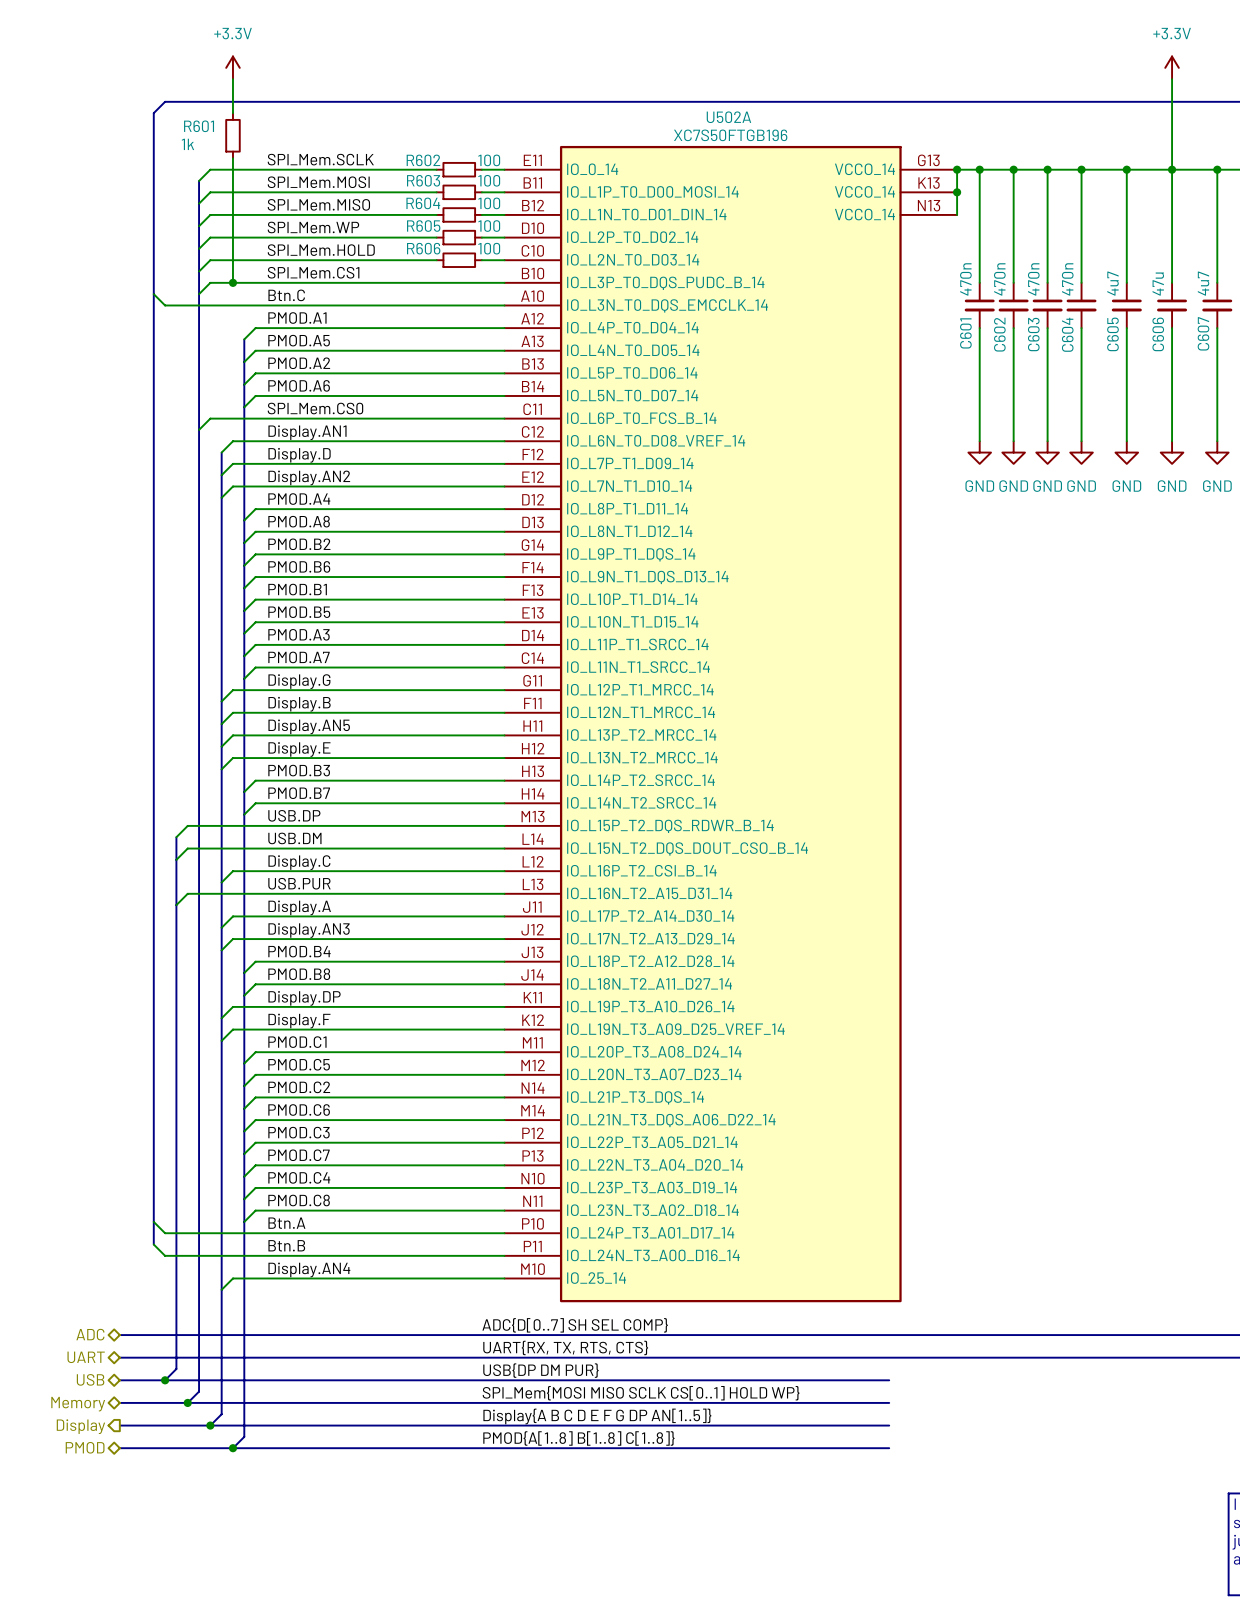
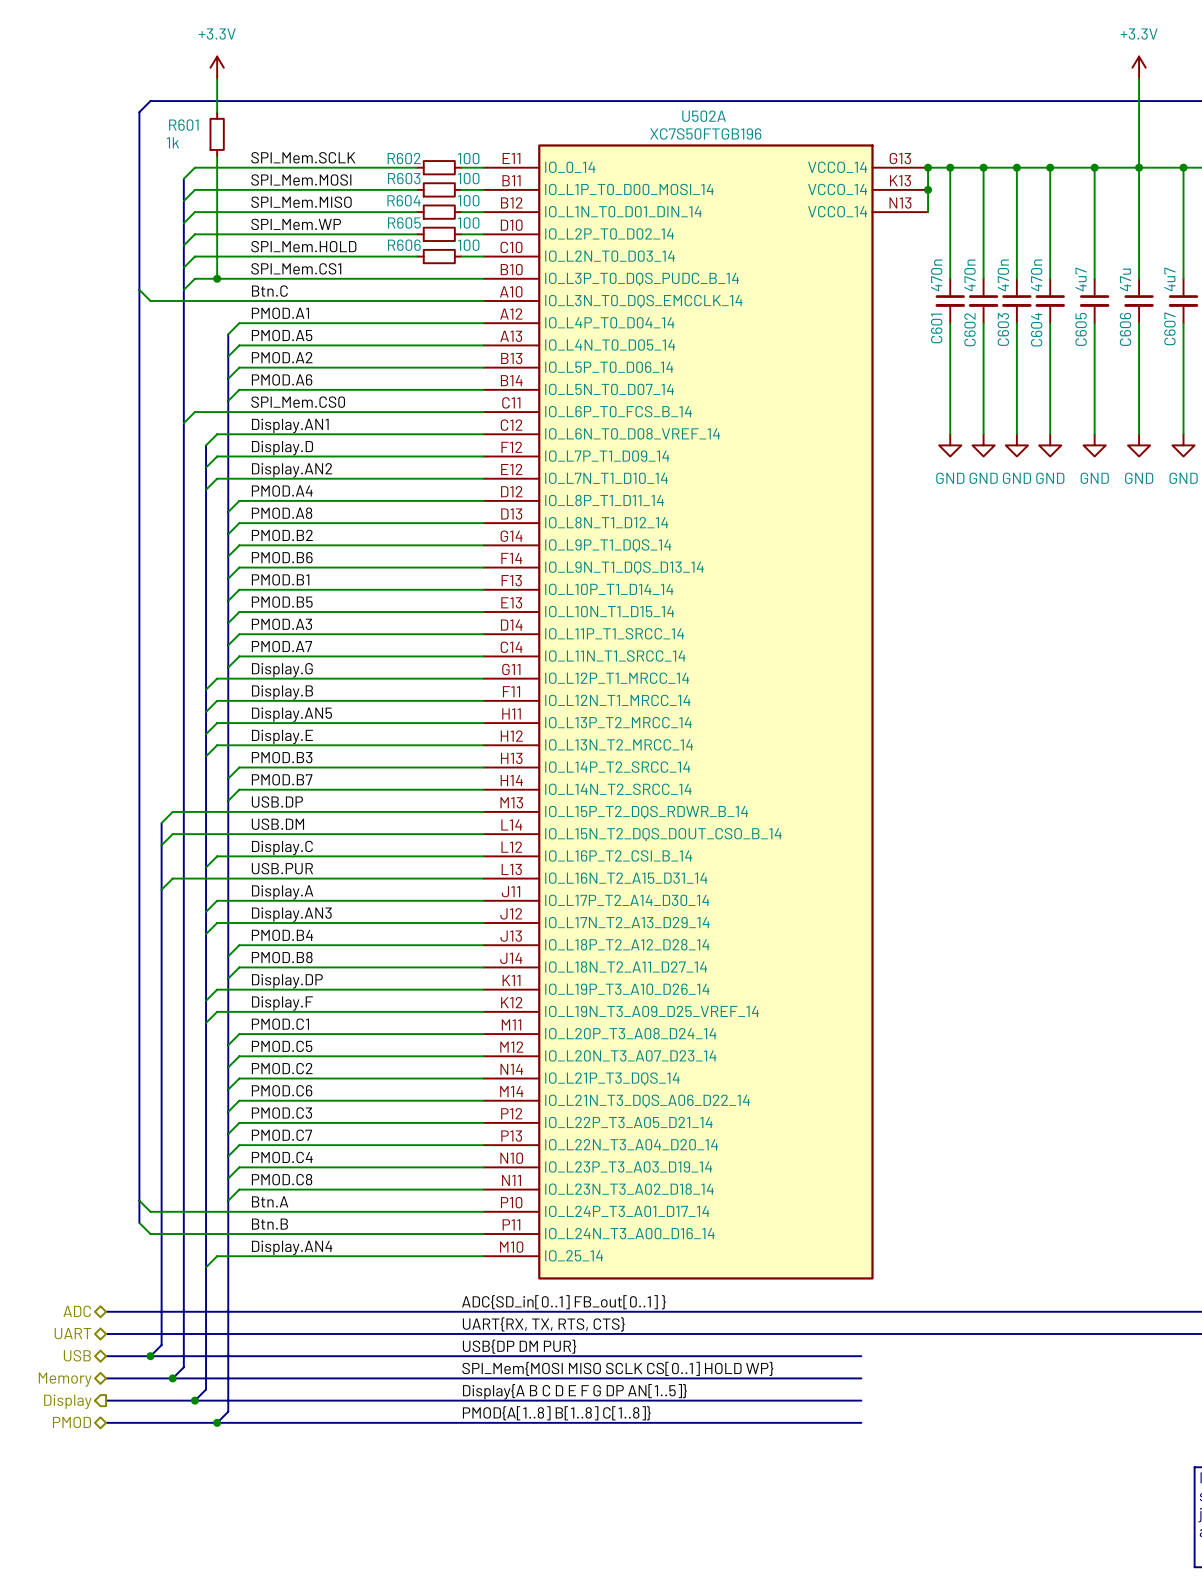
label: ADC{D[0..7] SH SEL COMP} (575, 1325) -> ADC{SD_in[0..1] FB_out[0..1] } (563, 1302)

